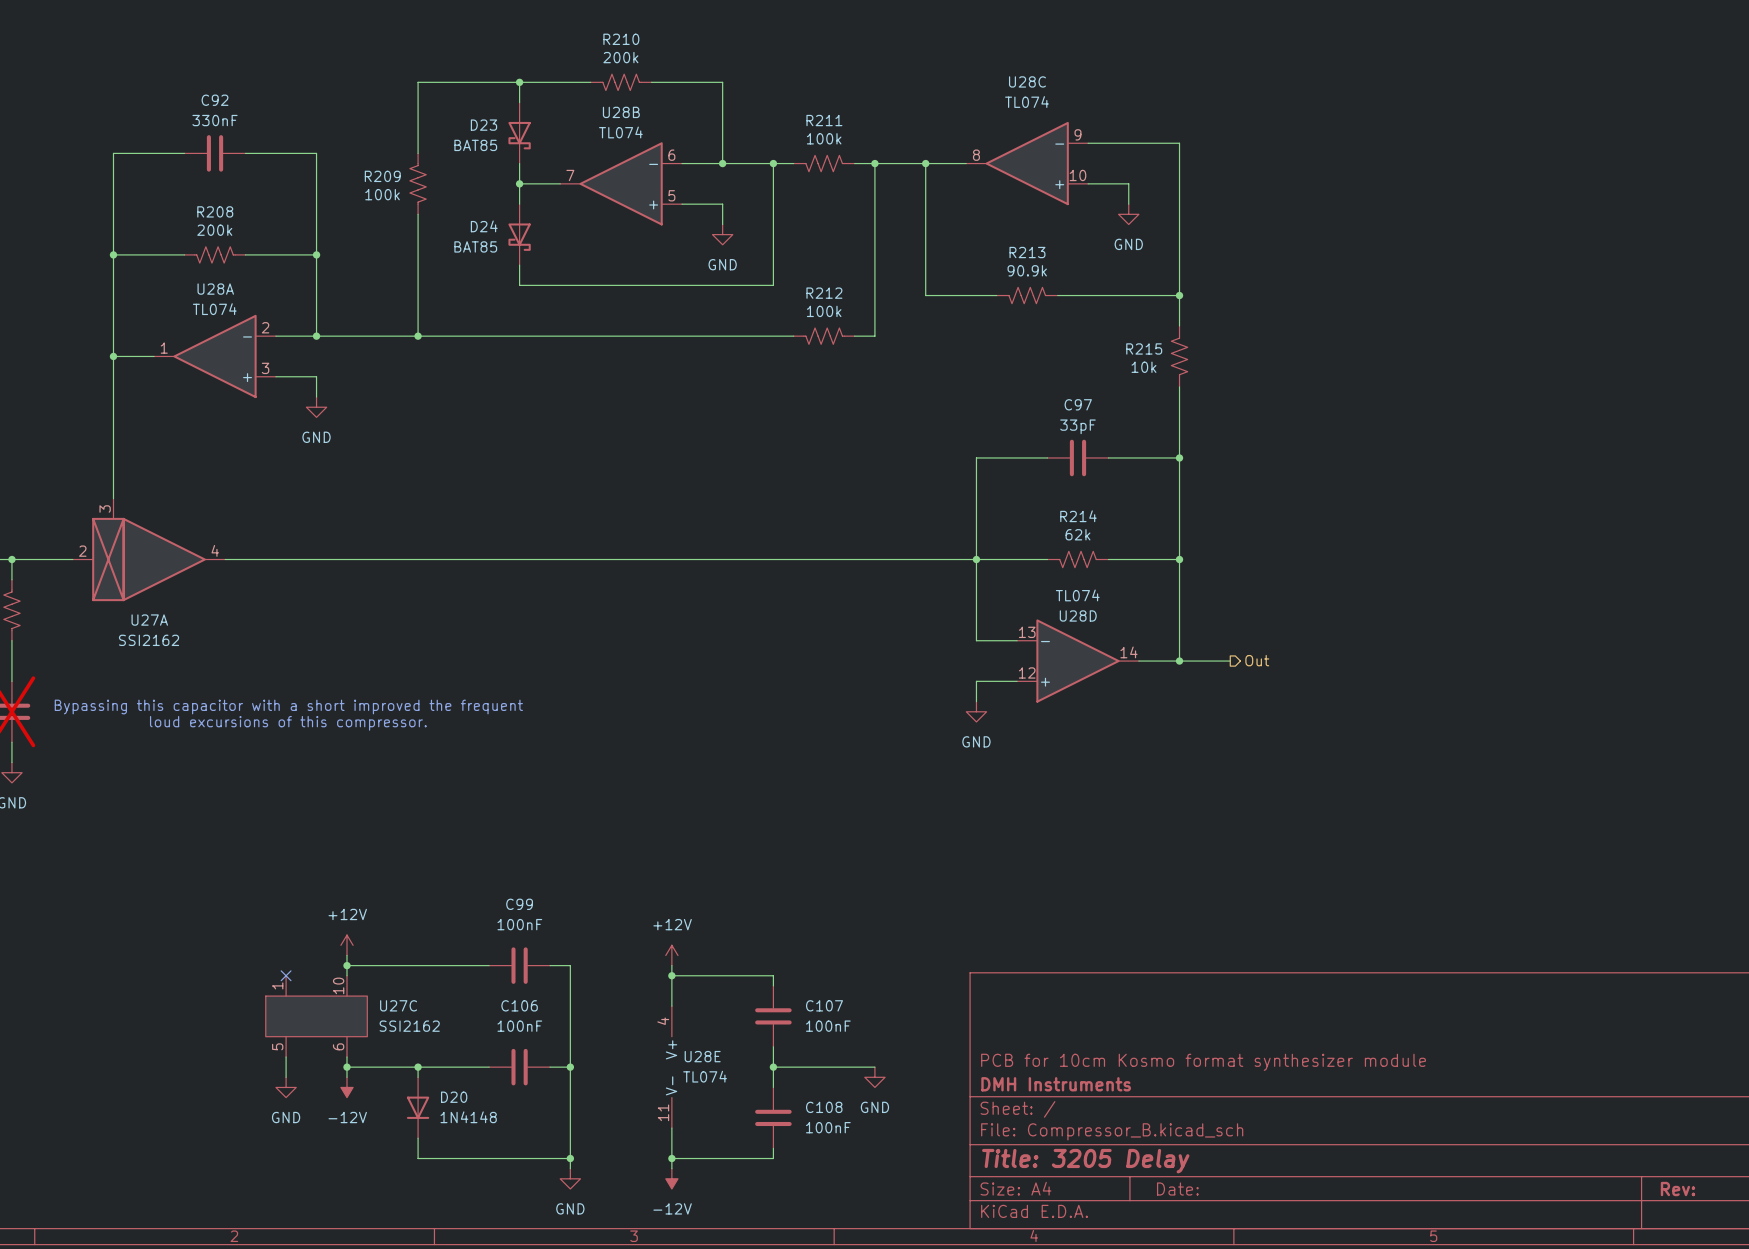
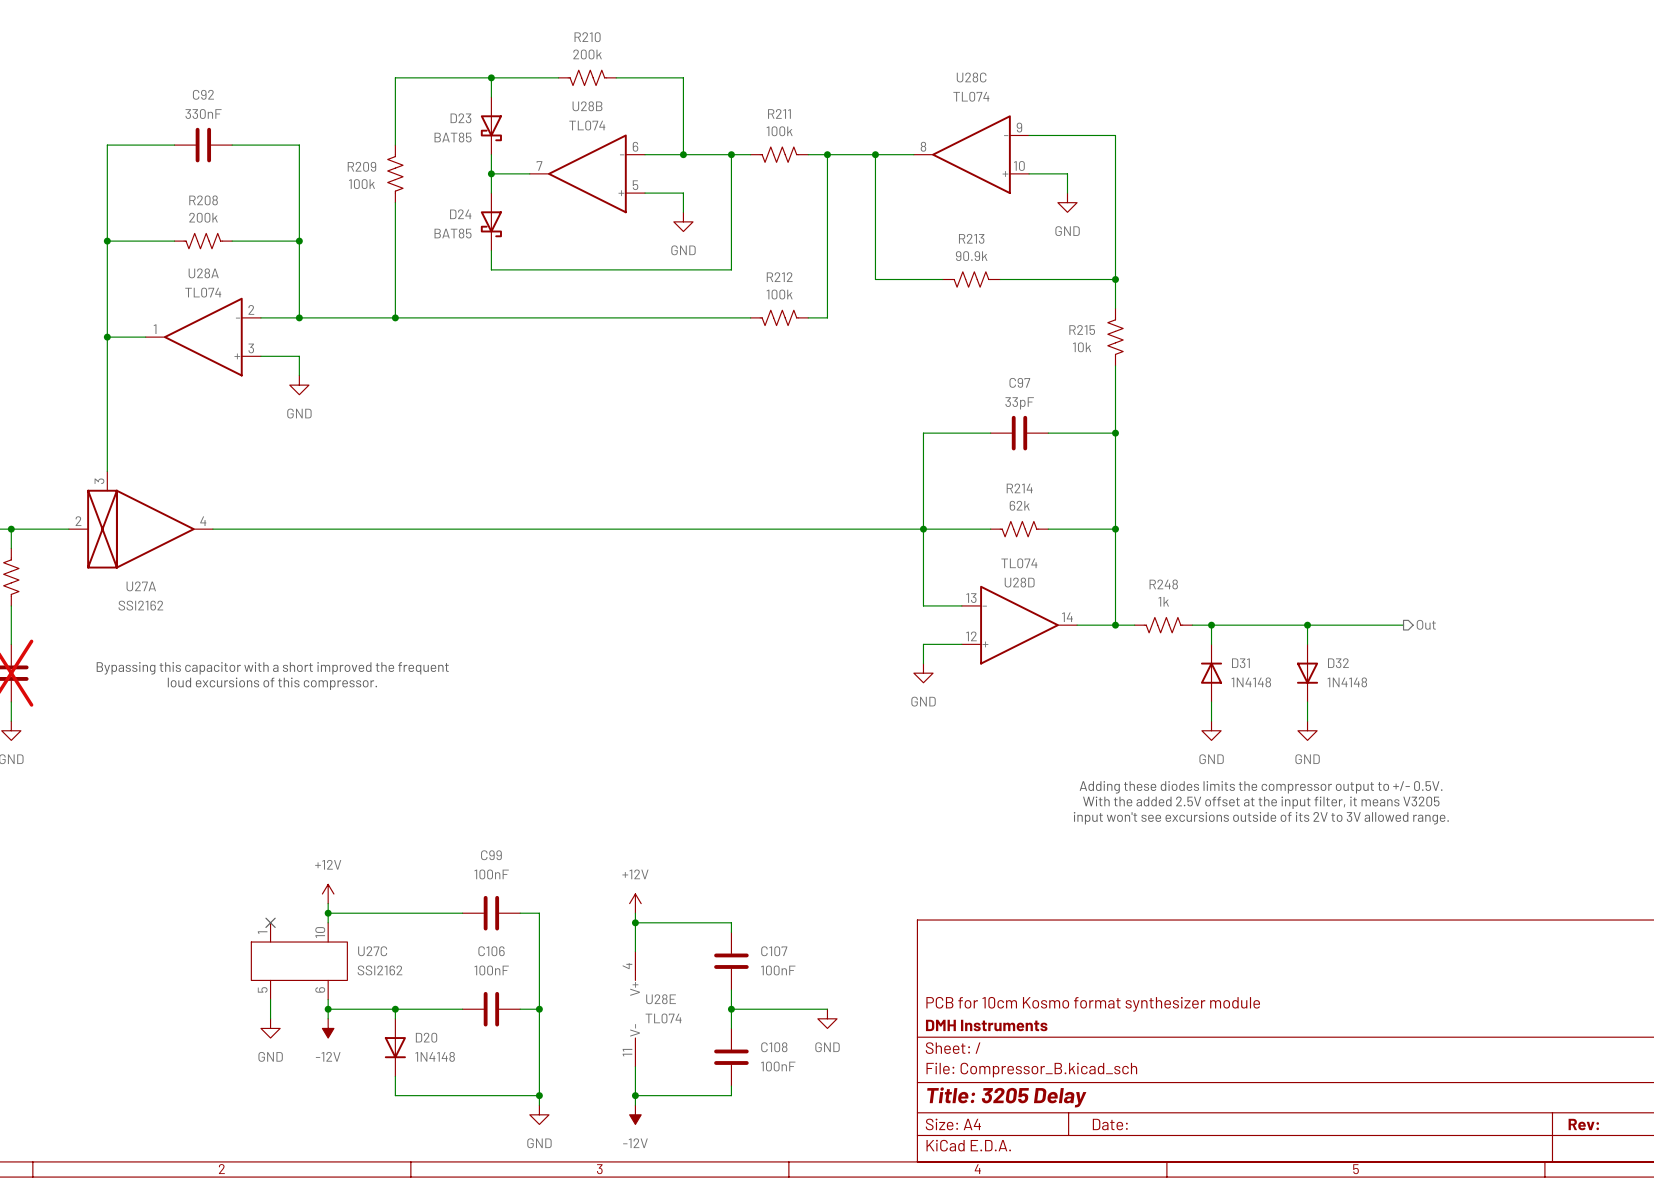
hierarchical label: Out (1257, 660) -> none
hierarchical label: none -> Out (1426, 624)
R248: none -> 1k (1163, 625)
wire: none -> (1192, 625) (1403, 625)
wire: none -> (1211, 625) (1211, 644)
junction: none -> (1211, 625)
wire: none -> (1307, 625) (1307, 644)
junction: none -> (1307, 625)
D31: none -> 1N4148 (1211, 673)
D32: none -> 1N4148 (1307, 673)
wire: none -> (1211, 701) (1211, 721)
wire: none -> (1307, 701) (1307, 721)
power symbol: none -> GND (1211, 730)
power symbol: none -> GND (1307, 730)
text: none -> Adding these diodes limits the compressor output to +/- 0.5V. (1261, 787)
text: none -> With the added 2.5V offset at the input filter, it means V3205 (1261, 802)
text: none -> input won't see excursions outside of its 2V to 3V allowed range. (1261, 818)

